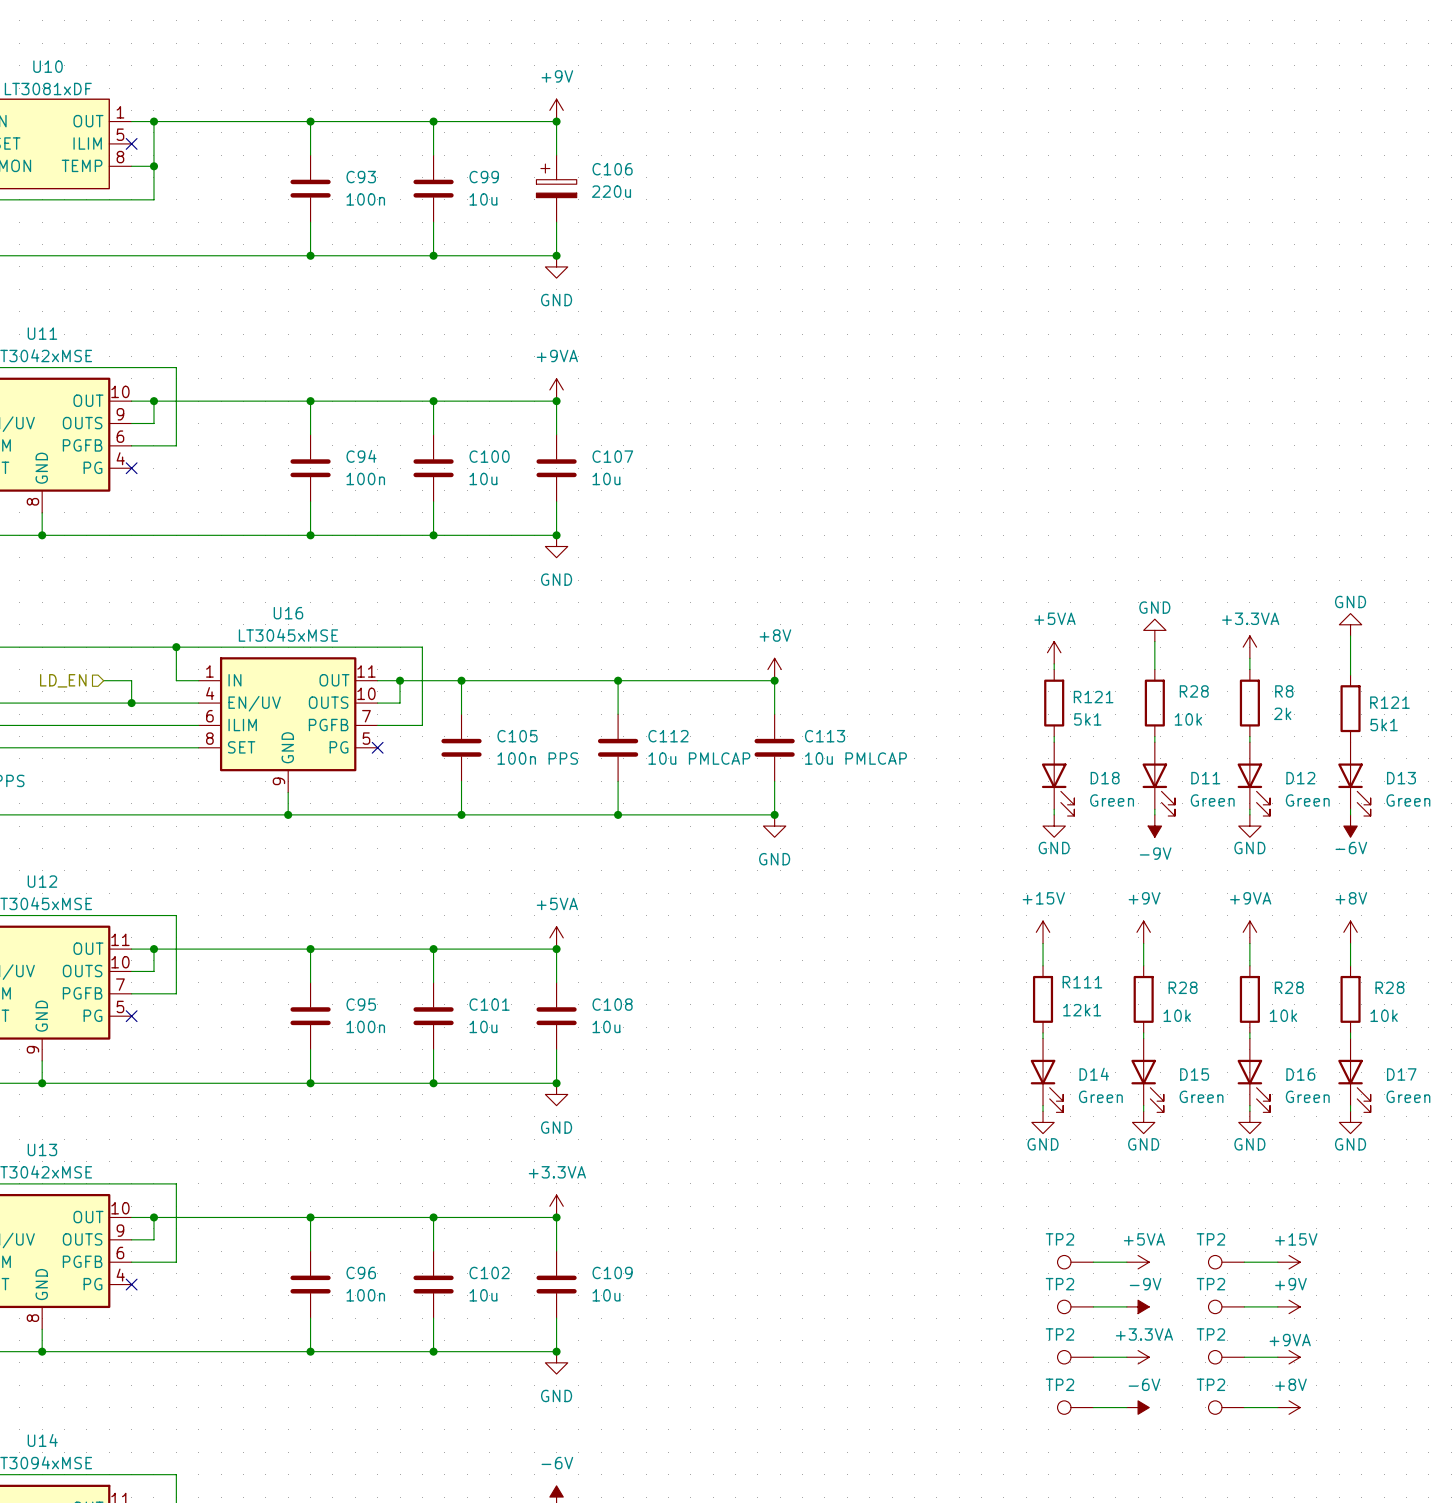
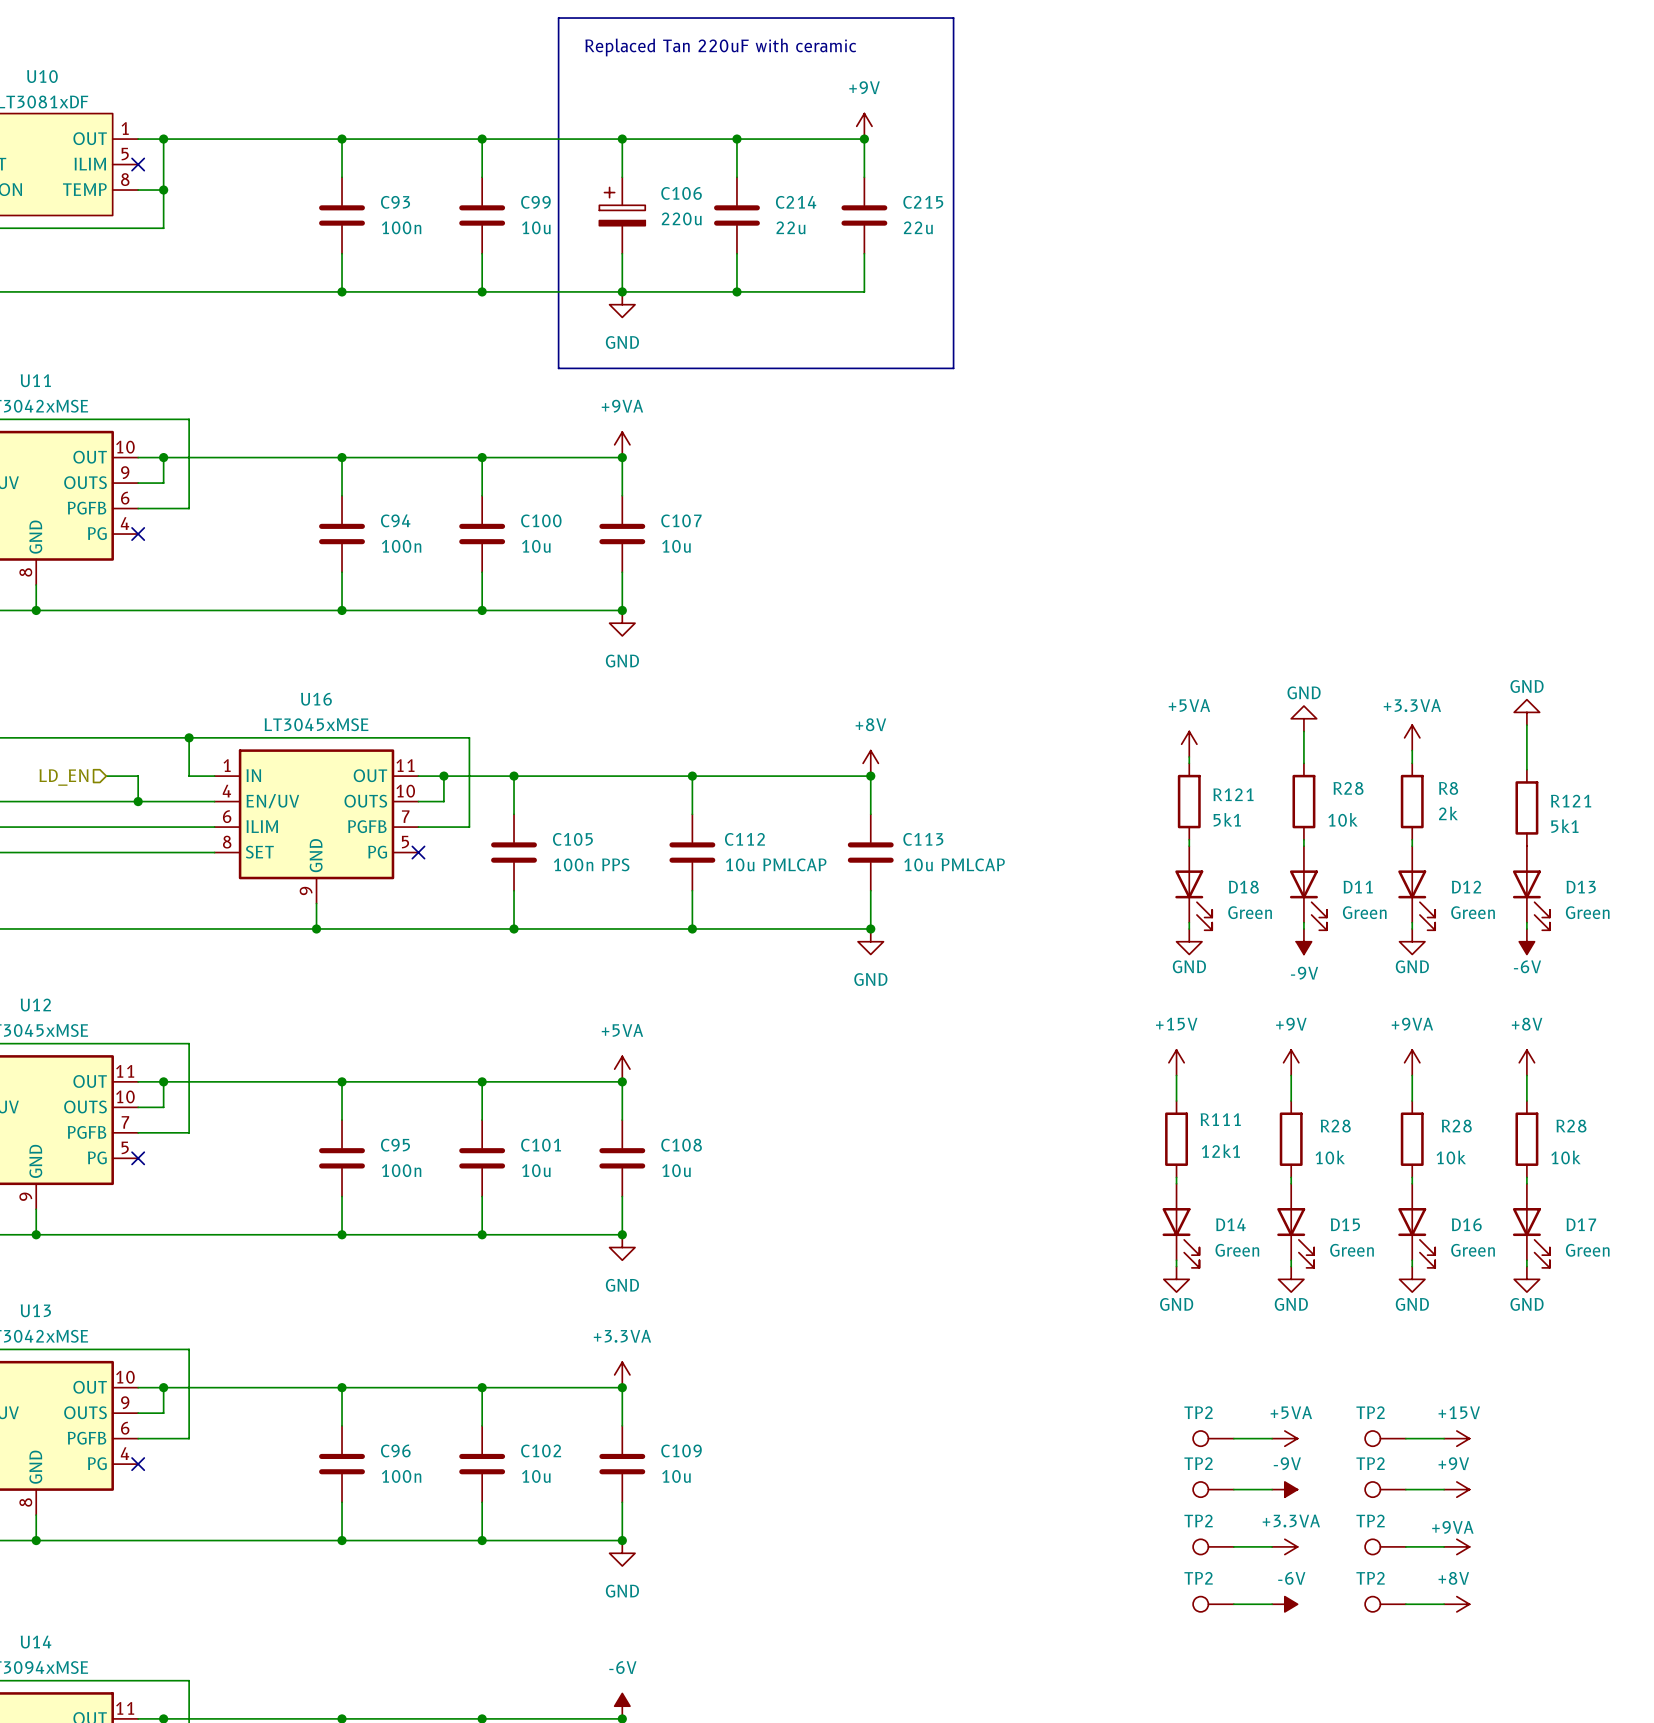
line: none -> (558, 18) (953, 18) (953, 368) (558, 368) (558, 18)
text: none -> Replaced Tan 220uF with ceramic (720, 47)
power symbol position: +9V (556, 110) -> +9V (864, 126)
wire: none -> (622, 139) (864, 139) (864, 177)
wire: none -> (736, 139) (736, 177)
junction: none -> (736, 139)
junction: none -> (864, 139)
C214: none -> 22u (736, 215)
C215: none -> 22u (864, 215)
wire: none -> (736, 253) (736, 291)
wire: none -> (864, 253) (864, 291) (622, 291)
junction: none -> (736, 291)

